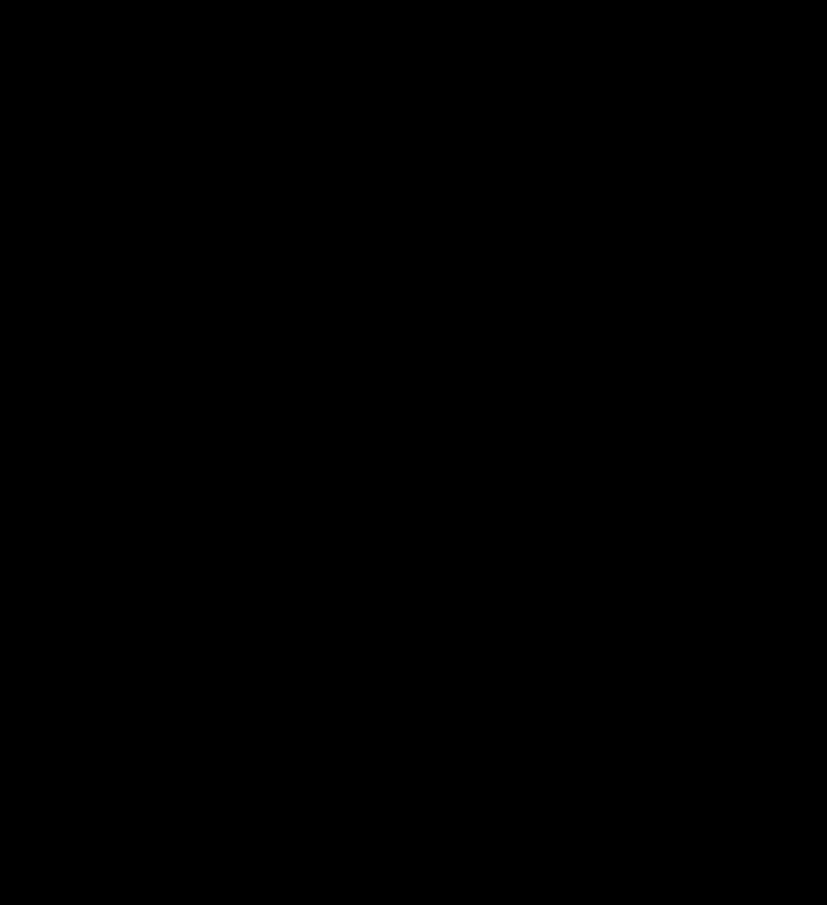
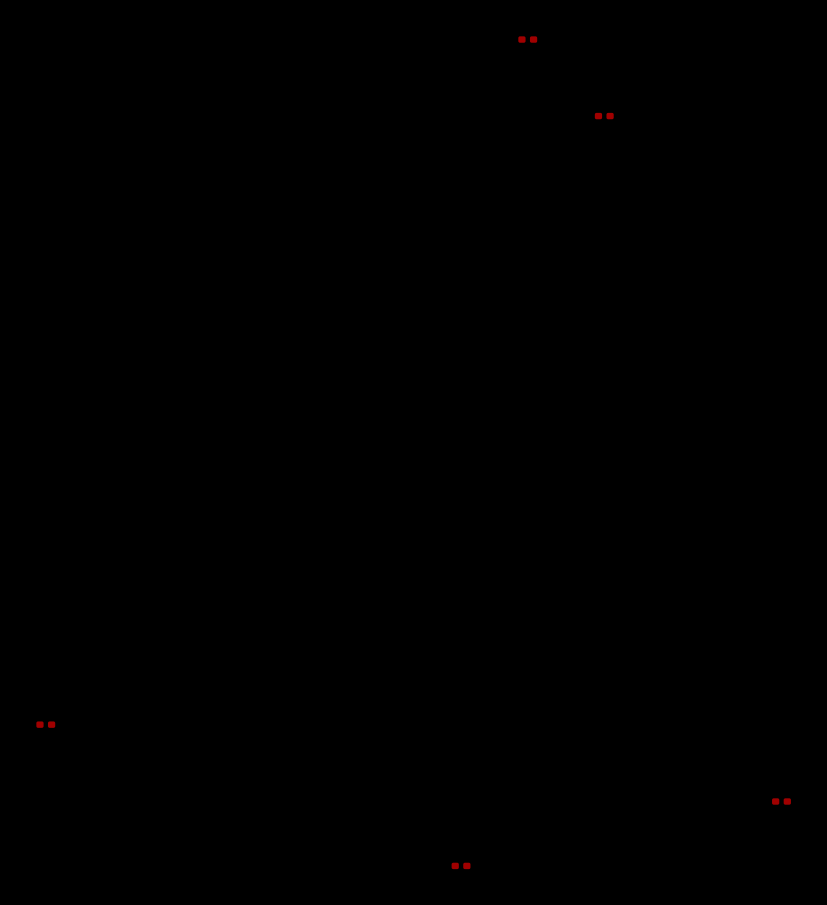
part: none -> (527, 39)
part: none -> (604, 116)
part: none -> (45, 724)
part: none -> (781, 801)
part: none -> (461, 865)

